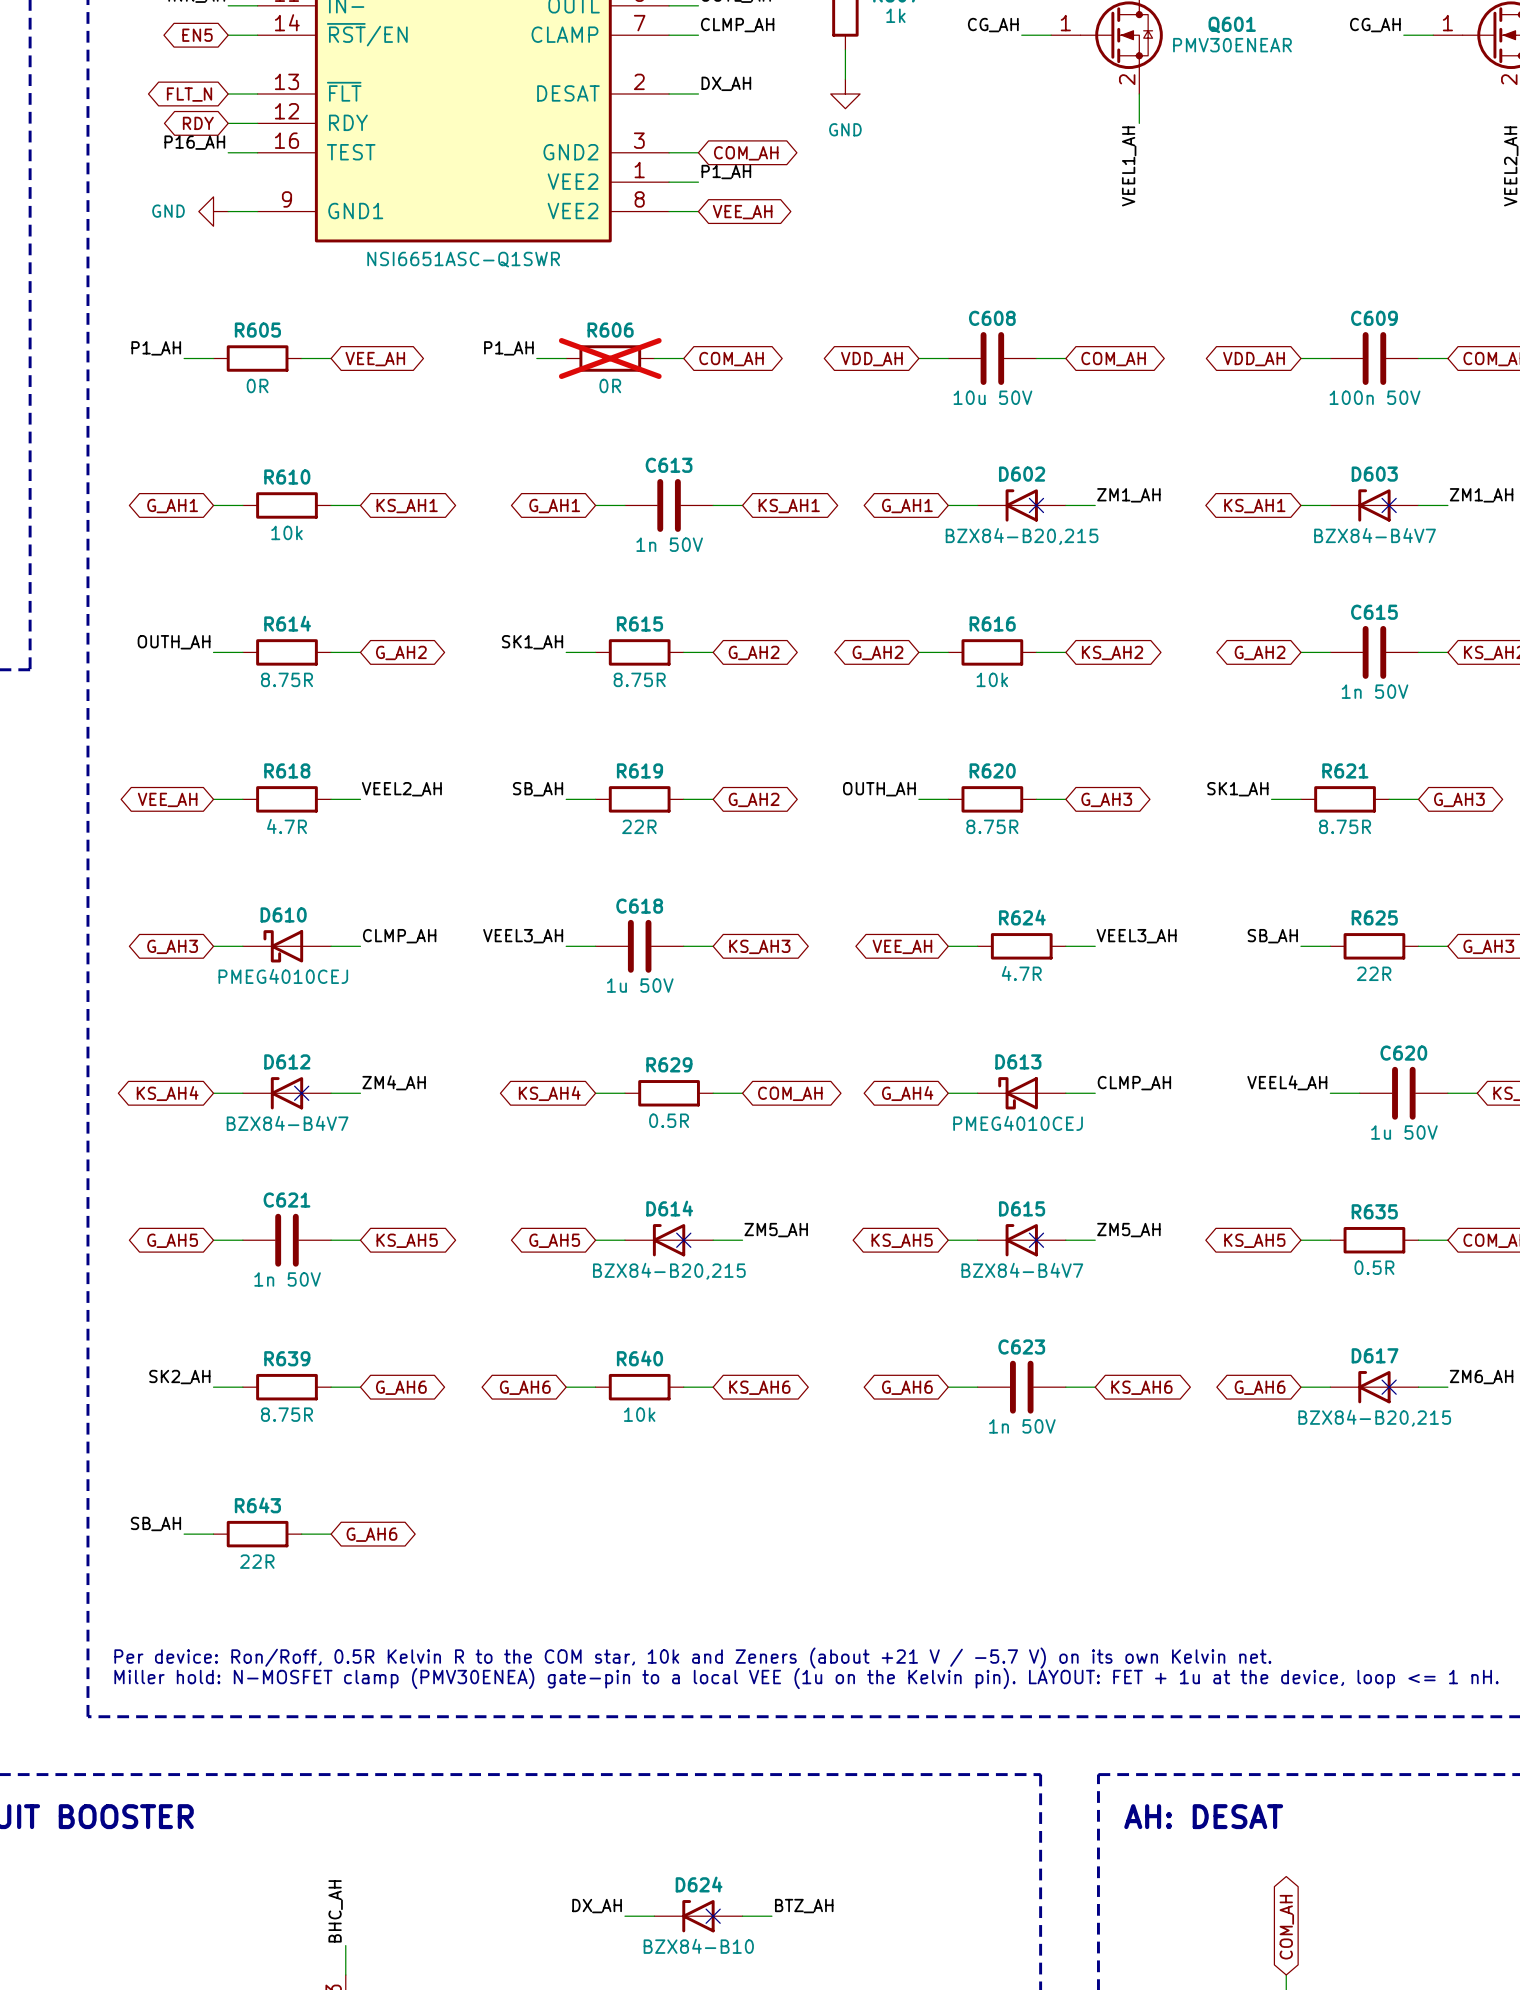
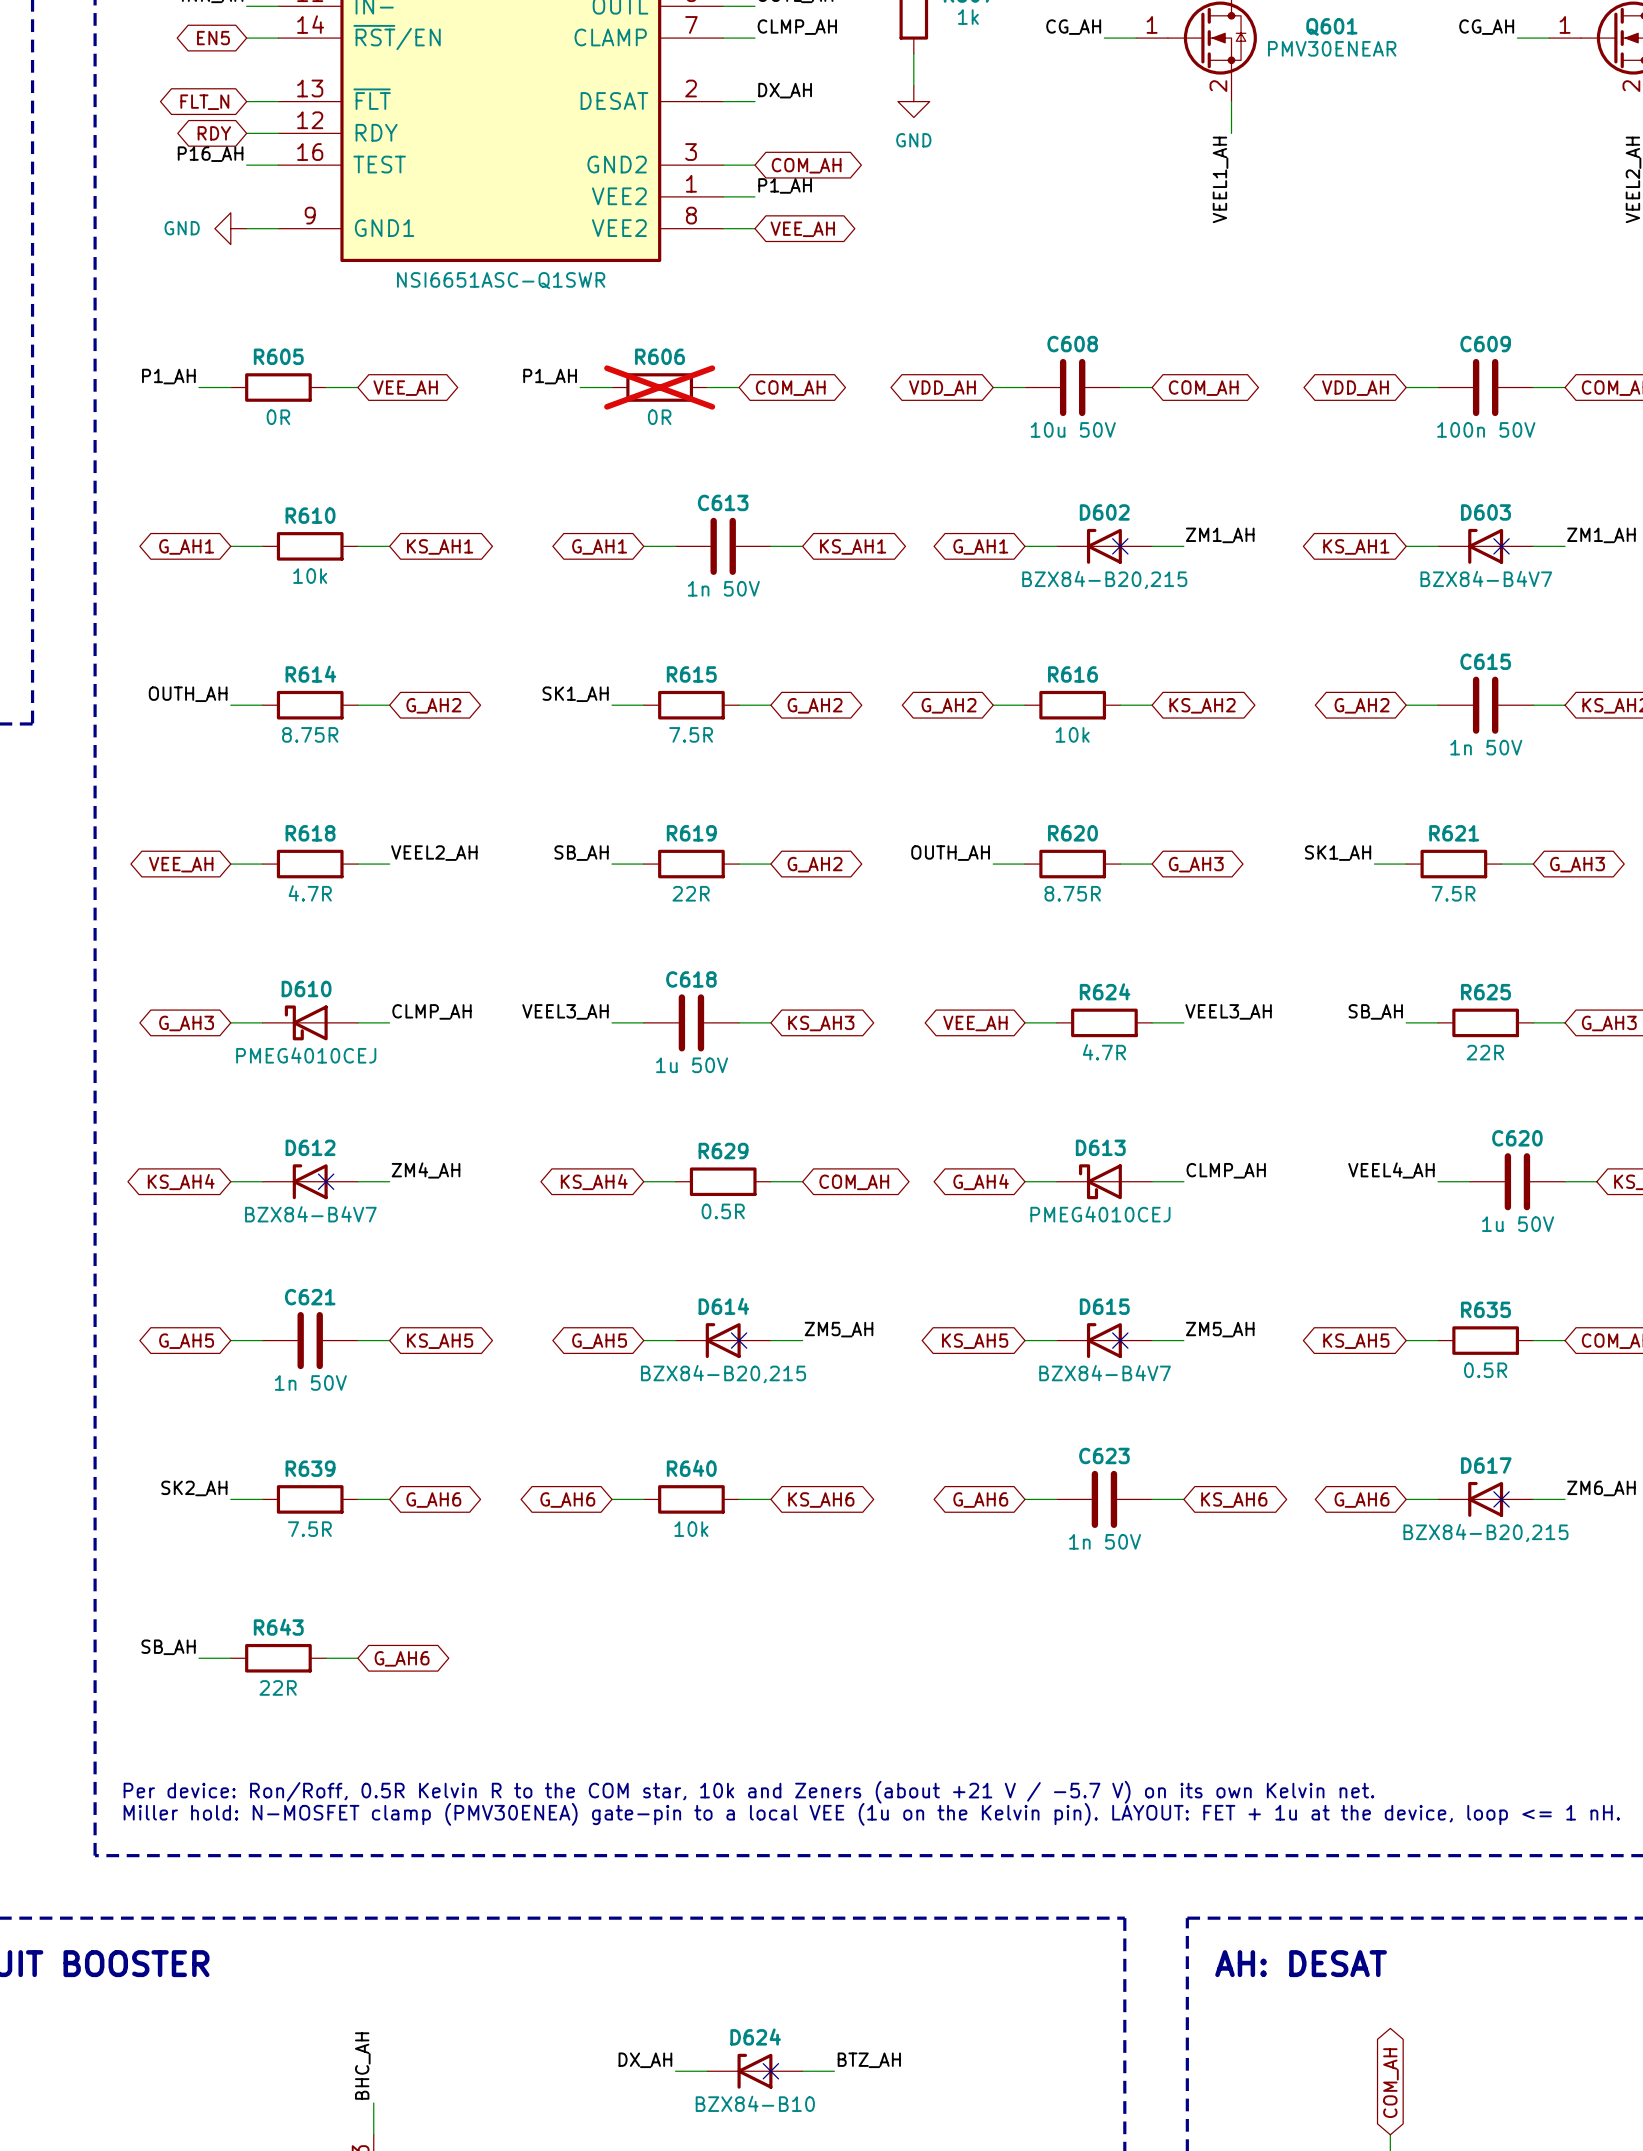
R615 value: 8.75R (639, 679) -> 7.5R (691, 734)
R621 value: 8.75R (1345, 826) -> 7.5R (1453, 893)
R639 value: 8.75R (286, 1414) -> 7.5R (309, 1529)

